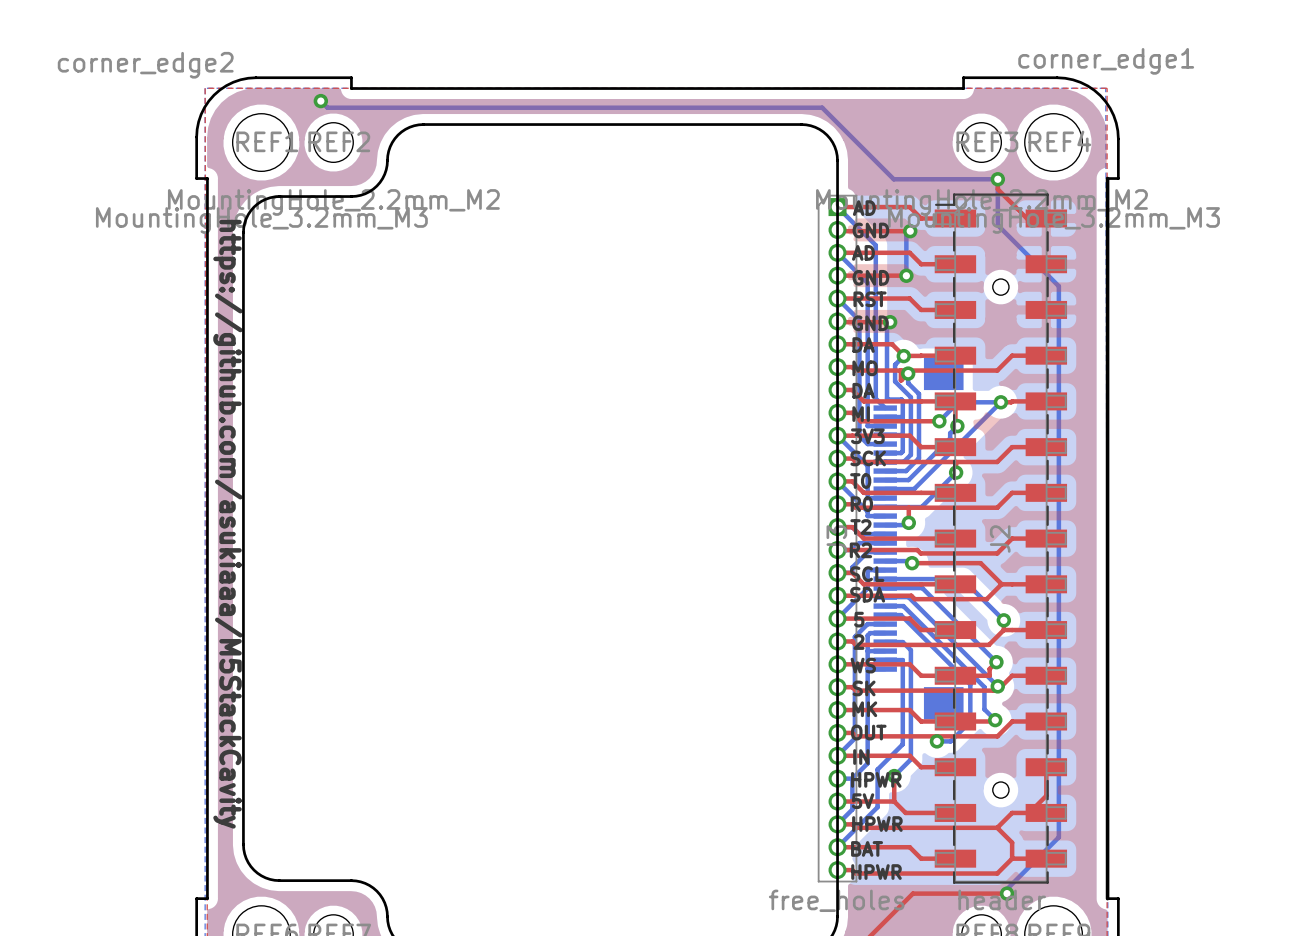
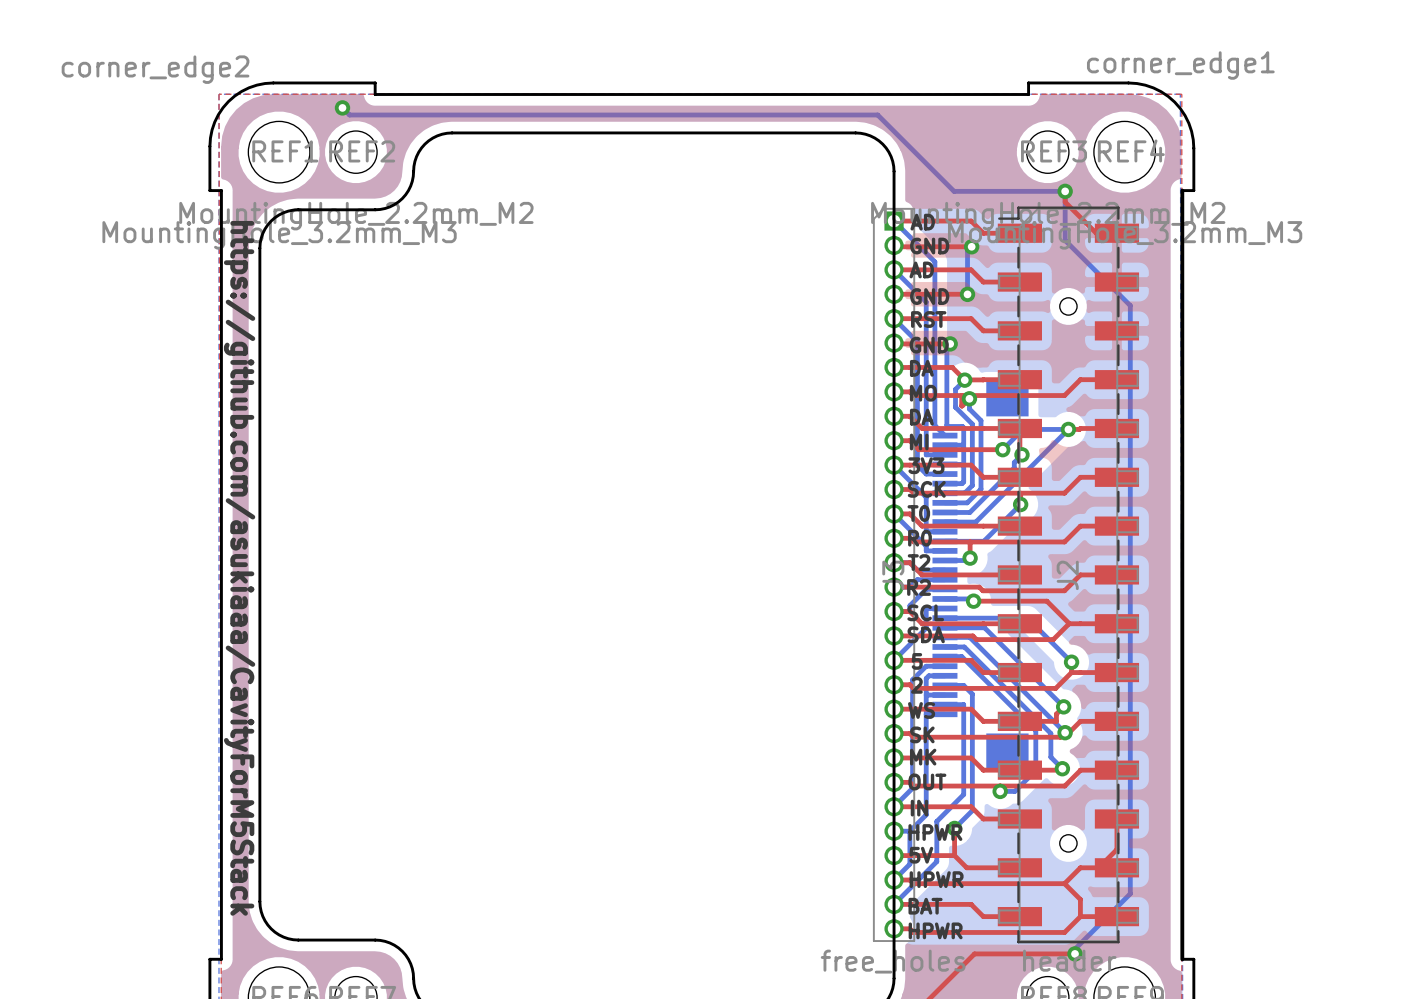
text: https://github.com/asukiaaa/M5StackCavity (227, 524) -> https://github.com/asukiaaa/CavityForM5Stack (239, 568)

